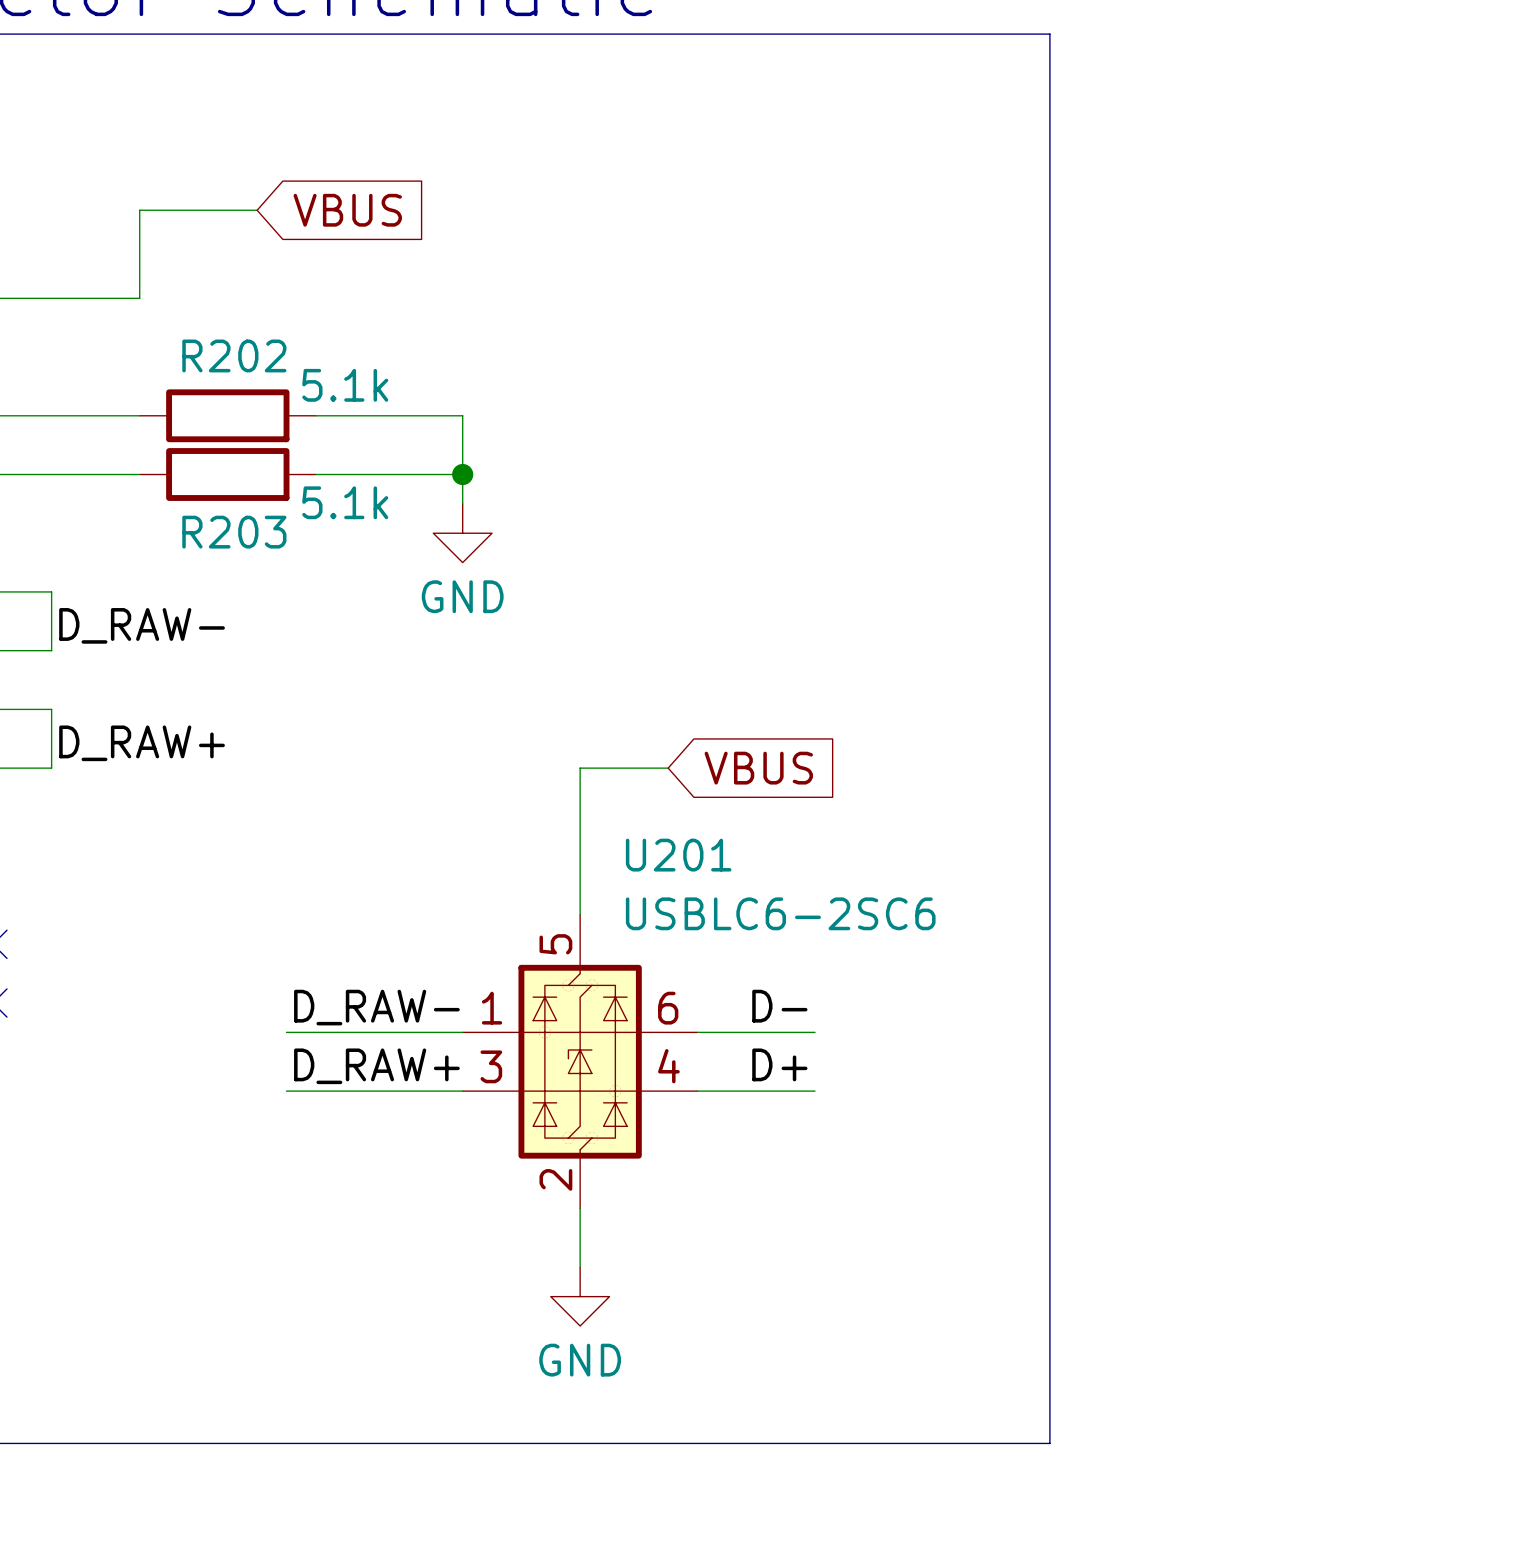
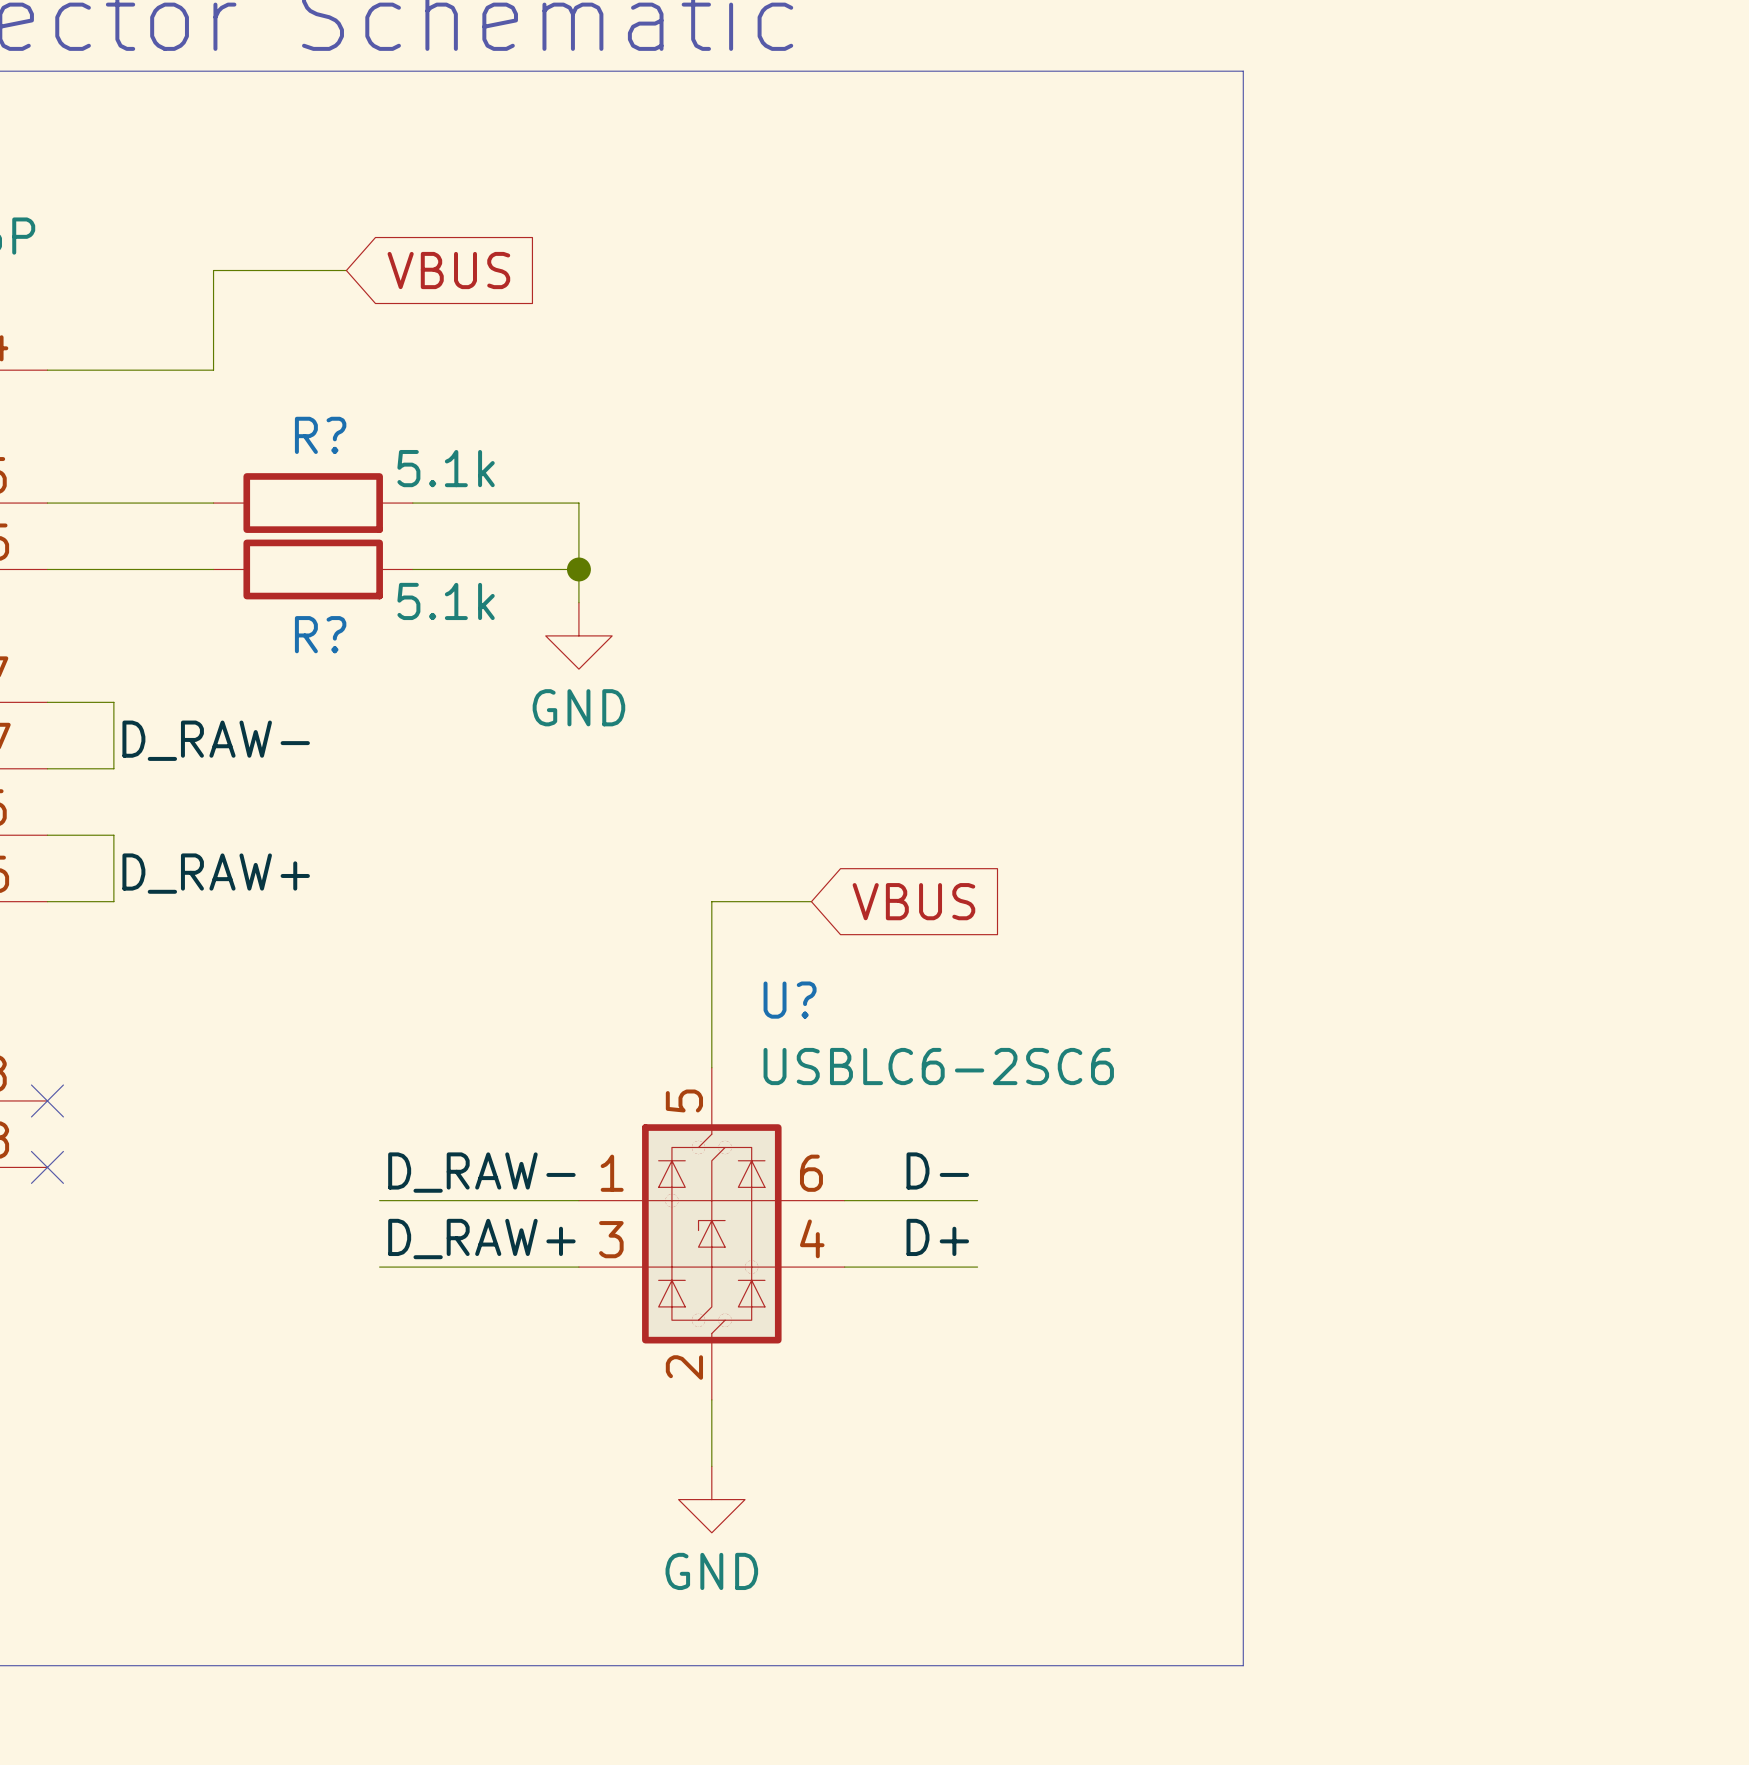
R202 name: R202 (234, 355) -> R? (320, 435)
R203 name: R203 (234, 532) -> R? (320, 634)
U201 name: U201 (678, 855) -> U? (790, 1000)

